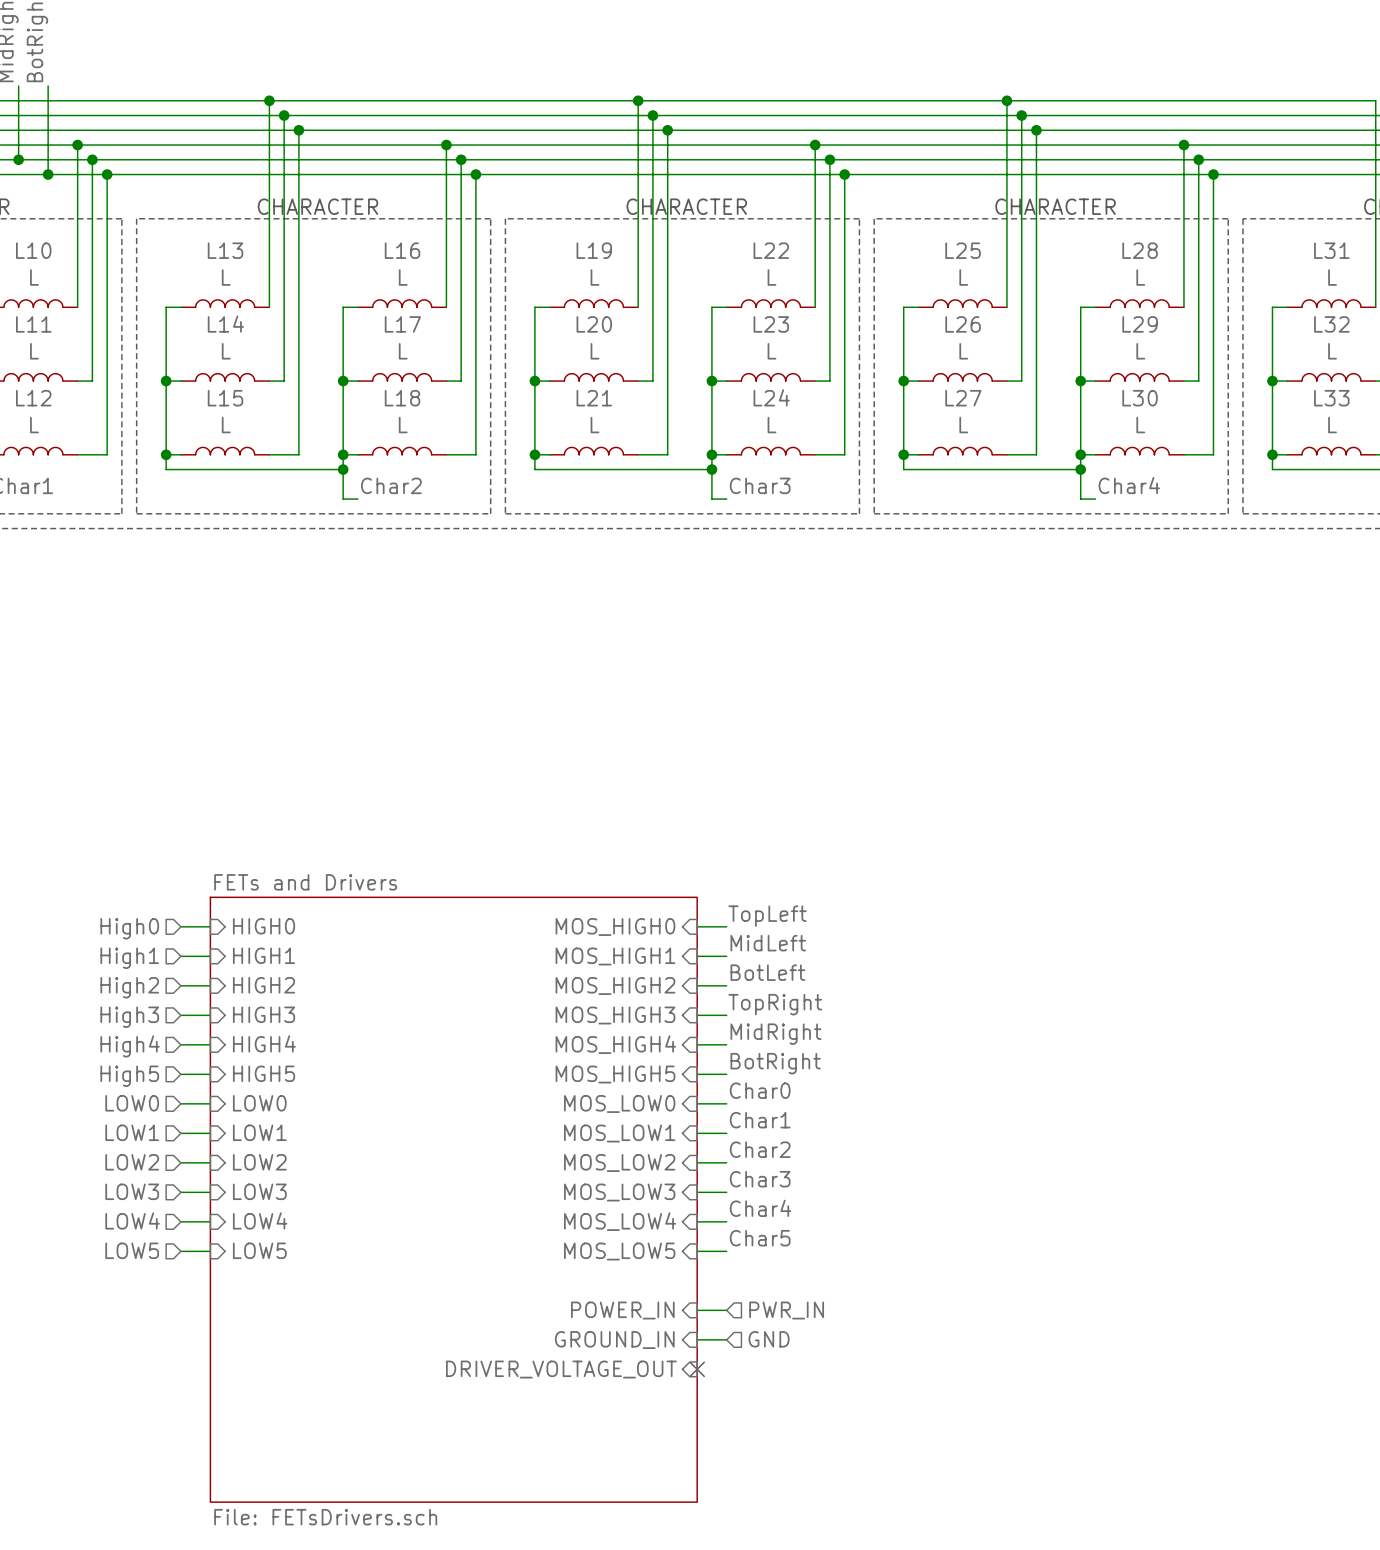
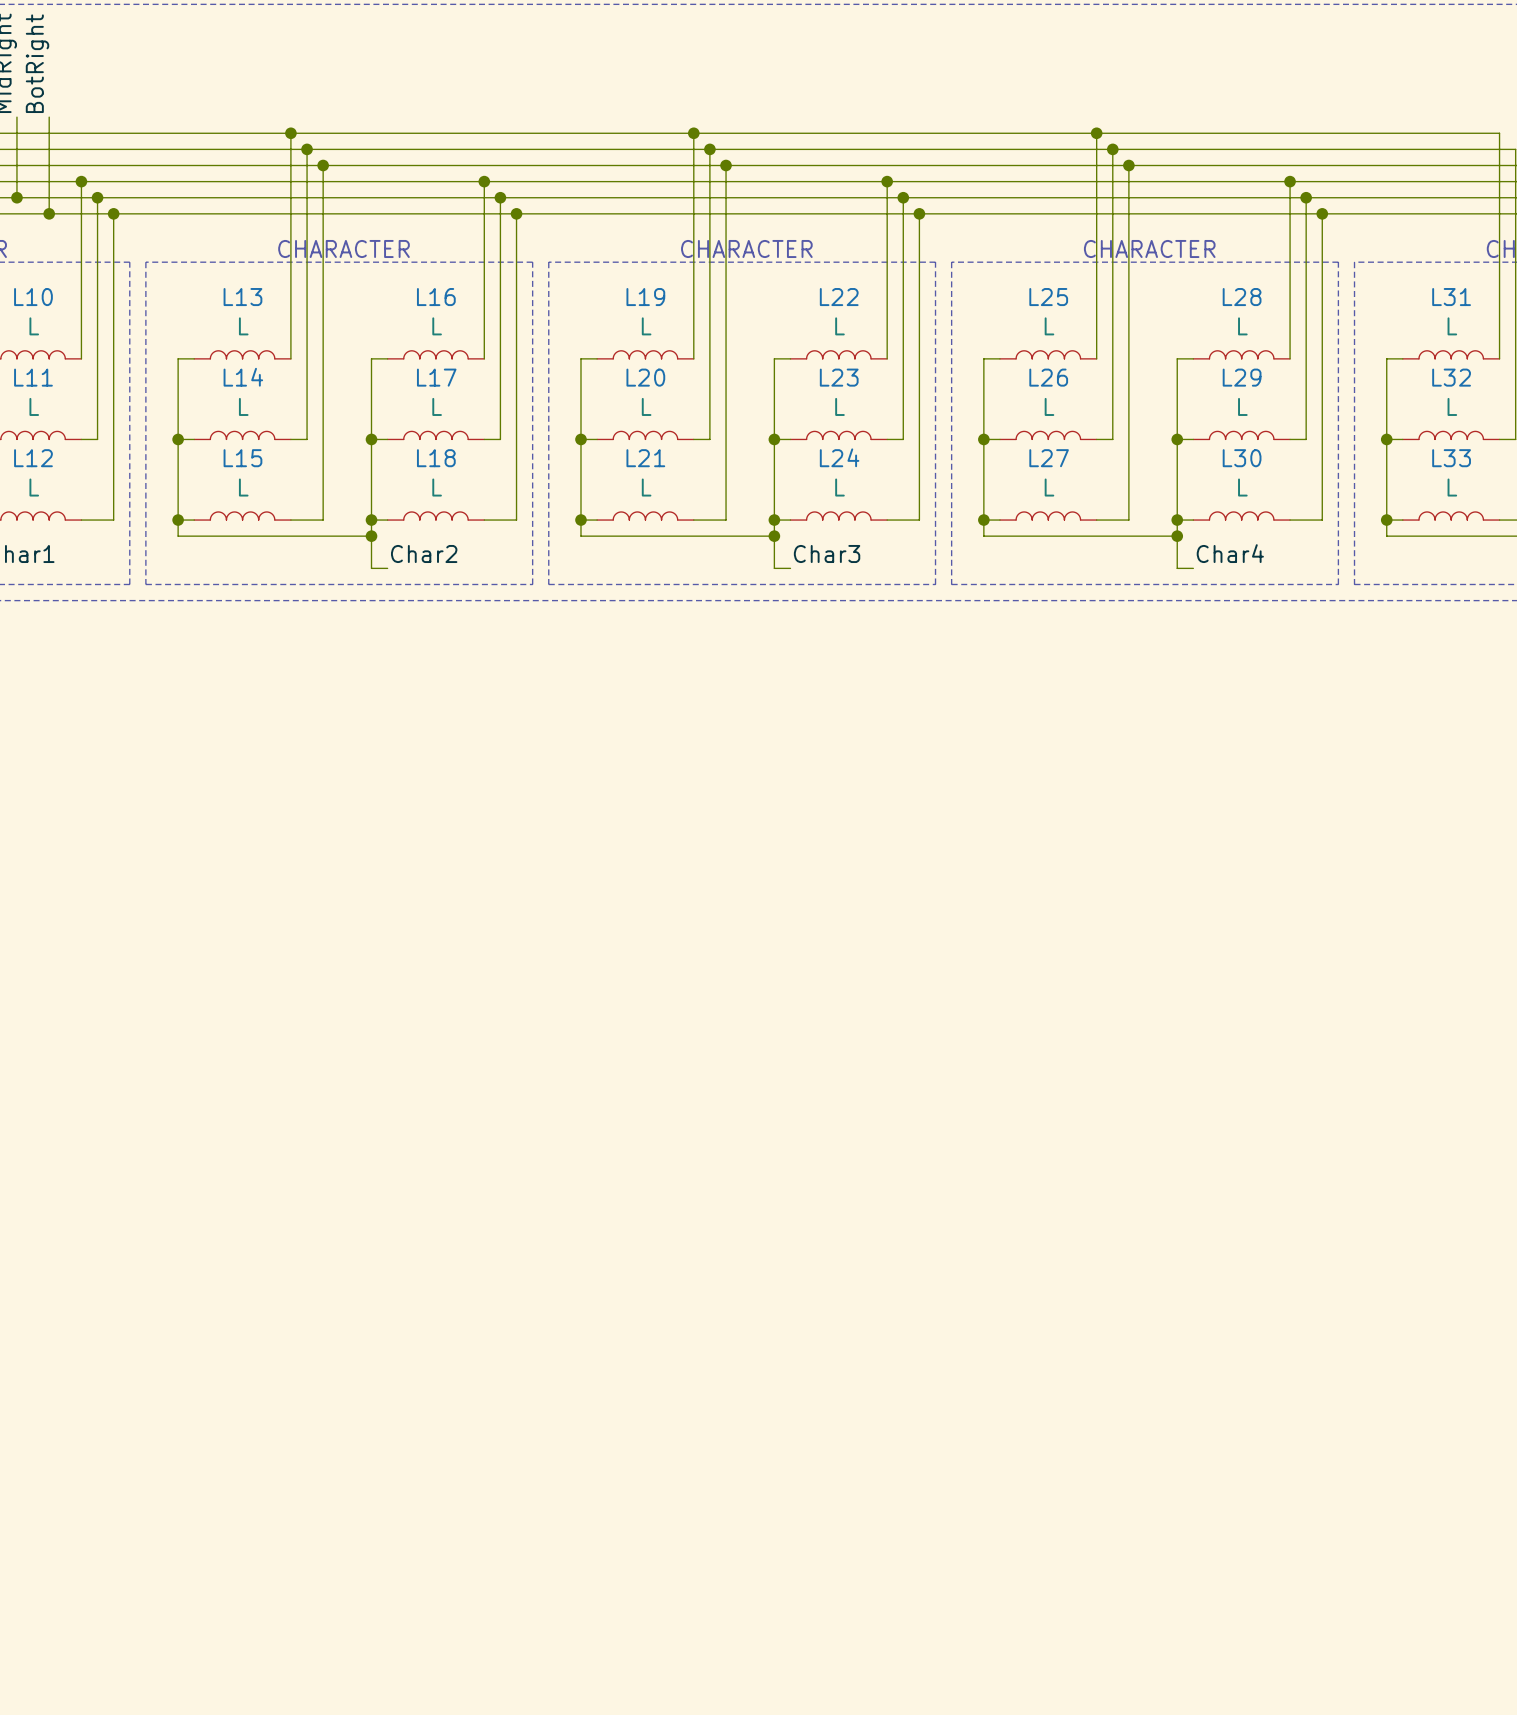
label: TopLeft (767, 916) -> none
wire: (180, 926) (210, 926) -> none
sheet pin: HIGH0 (264, 926) -> none
sheet pin: MOS_HIGH0 (615, 926) -> none
wire: (697, 926) (726, 926) -> none
hierarchical label: High0 (129, 928) -> none
label: MidLeft (768, 943) -> none
sheet pin: HIGH1 (264, 955) -> none
wire: (180, 956) (210, 956) -> none
sheet pin: MOS_HIGH1 (615, 956) -> none
wire: (697, 956) (726, 956) -> none
hierarchical label: High1 (129, 958) -> none
label: BotLeft (767, 972) -> none
wire: (180, 985) (210, 985) -> none
sheet pin: HIGH2 (264, 985) -> none
sheet pin: MOS_HIGH2 (615, 985) -> none
wire: (697, 985) (726, 985) -> none
hierarchical label: High2 (129, 987) -> none
label: TopRight (775, 1004) -> none
sheet pin: HIGH3 (264, 1014) -> none
wire: (180, 1015) (210, 1015) -> none
sheet pin: MOS_HIGH3 (615, 1015) -> none
wire: (697, 1015) (726, 1015) -> none
hierarchical label: High3 (129, 1017) -> none
label: MidRight (775, 1034) -> none
sheet pin: HIGH4 (264, 1043) -> none
wire: (180, 1044) (210, 1044) -> none
sheet pin: MOS_HIGH4 (615, 1044) -> none
wire: (697, 1044) (726, 1044) -> none
hierarchical label: High4 (130, 1046) -> none
label: BotRight (775, 1063) -> none
sheet pin: HIGH5 (264, 1073) -> none
wire: (180, 1074) (210, 1074) -> none
sheet pin: MOS_HIGH5 (615, 1074) -> none
wire: (697, 1074) (726, 1074) -> none
hierarchical label: High5 (129, 1076) -> none
label: Char0 (760, 1090) -> none
hierarchical label: LOW0 (132, 1103) -> none
wire: (180, 1103) (210, 1103) -> none
sheet pin: LOW0 (259, 1103) -> none
sheet pin: MOS_LOW0 (619, 1103) -> none
wire: (697, 1103) (726, 1103) -> none
label: Char1 (760, 1120) -> none
hierarchical label: LOW1 (132, 1132) -> none
sheet pin: LOW1 (259, 1132) -> none
wire: (180, 1133) (210, 1133) -> none
sheet pin: MOS_LOW1 (619, 1133) -> none
wire: (697, 1133) (726, 1133) -> none
label: Char2 (760, 1149) -> none
hierarchical label: LOW2 (132, 1162) -> none
wire: (180, 1162) (210, 1162) -> none
sheet pin: LOW2 (259, 1162) -> none
wire: (697, 1162) (726, 1162) -> none
sheet pin: MOS_LOW2 (619, 1163) -> none
label: Char3 (760, 1179) -> none
hierarchical label: LOW3 (132, 1191) -> none
sheet pin: LOW3 (259, 1191) -> none
wire: (180, 1192) (210, 1192) -> none
sheet pin: MOS_LOW3 (619, 1192) -> none
wire: (697, 1192) (726, 1192) -> none
sheet FETs and Drivers: File: FETsDrivers.sch (453, 1199) -> none
label: Char4 (760, 1208) -> none
hierarchical label: LOW4 (132, 1220) -> none
sheet pin: LOW4 (260, 1220) -> none
wire: (180, 1221) (210, 1221) -> none
sheet pin: MOS_LOW4 (620, 1221) -> none
wire: (697, 1221) (726, 1221) -> none
label: Char5 (760, 1238) -> none
hierarchical label: LOW5 (132, 1250) -> none
sheet pin: LOW5 (259, 1250) -> none
wire: (180, 1251) (210, 1251) -> none
sheet pin: MOS_LOW5 (619, 1251) -> none
wire: (697, 1251) (726, 1251) -> none
sheet pin: POWER_IN (622, 1310) -> none
wire: (697, 1310) (726, 1310) -> none
hierarchical label: PWR_IN (786, 1310) -> none
wire: (697, 1339) (726, 1339) -> none
hierarchical label: GND (769, 1339) -> none
sheet pin: GROUND_IN (614, 1340) -> none
sheet pin: DRIVER_VOLTAGE_OUT (561, 1369) -> none
no-connect mark: (697, 1369) -> none

